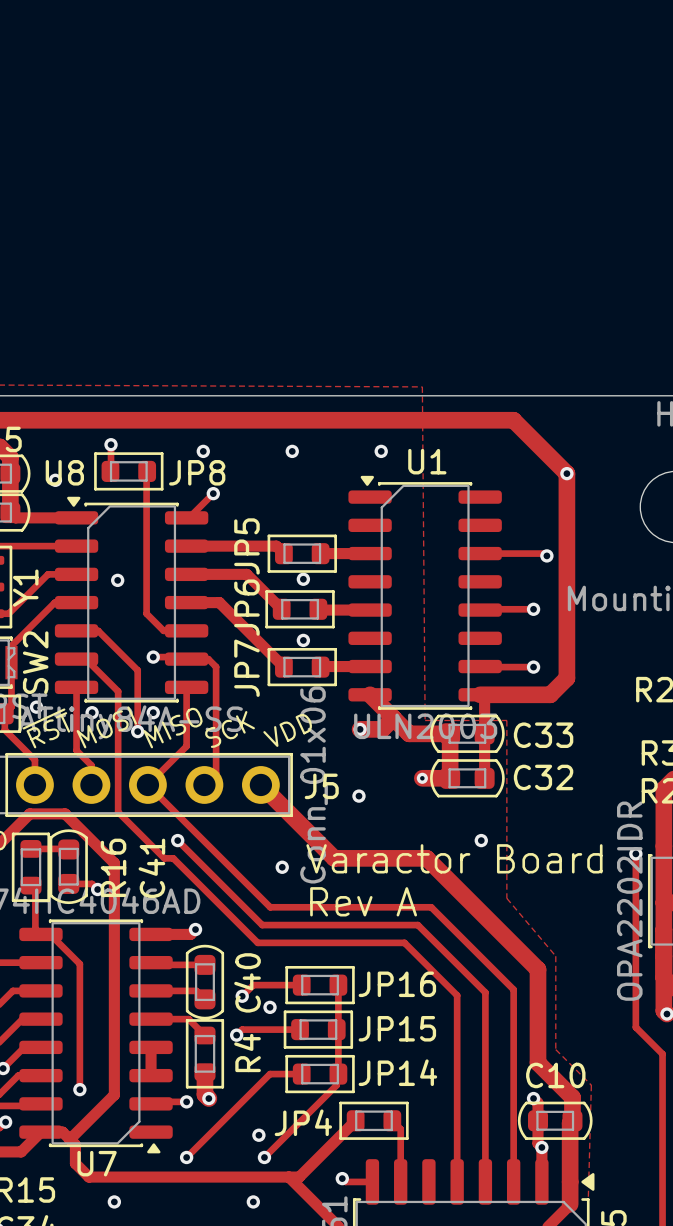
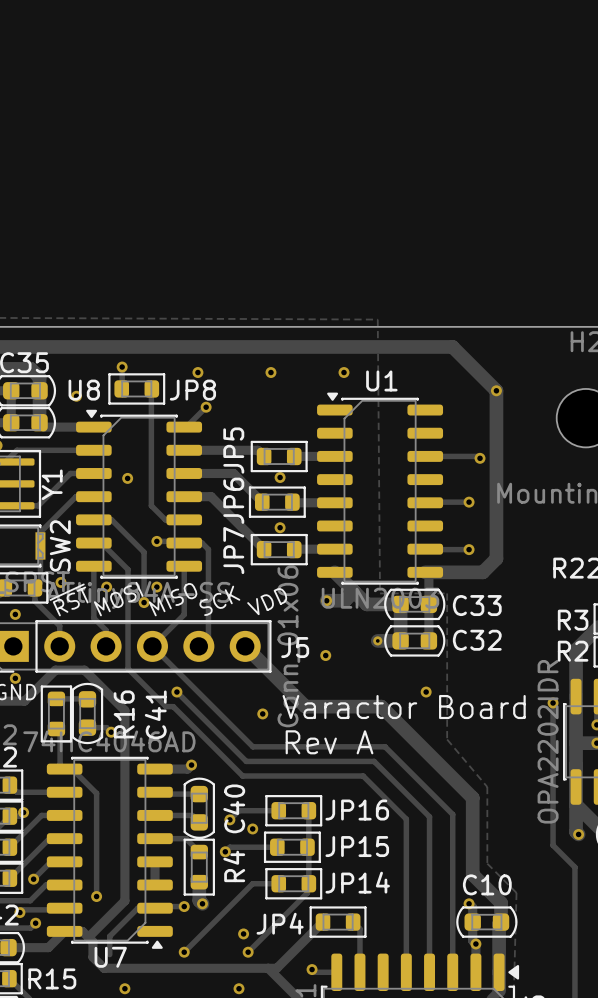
track: none -> (155, 908) (137, 908) (109, 936) (109, 954)

